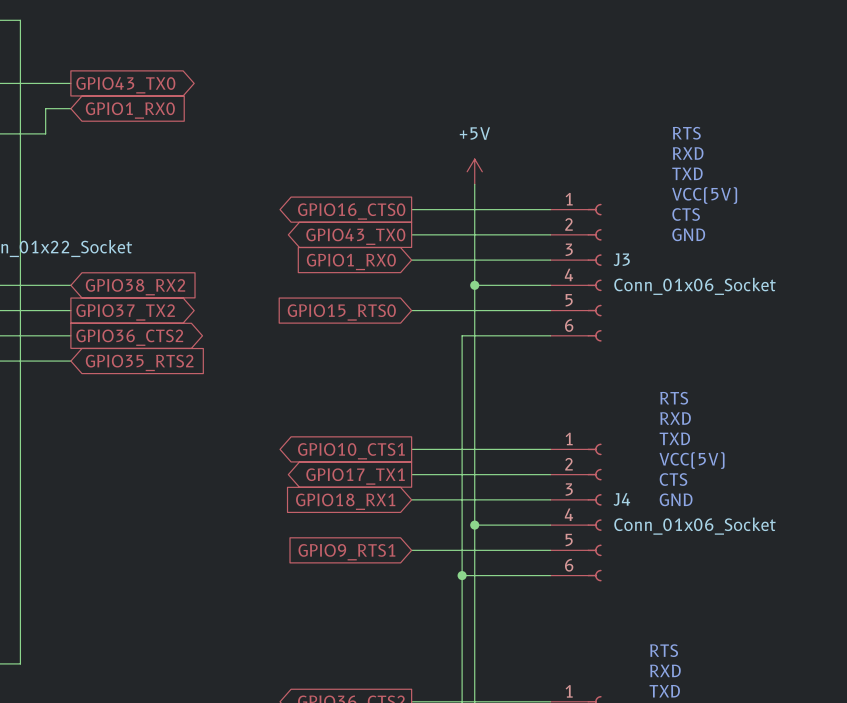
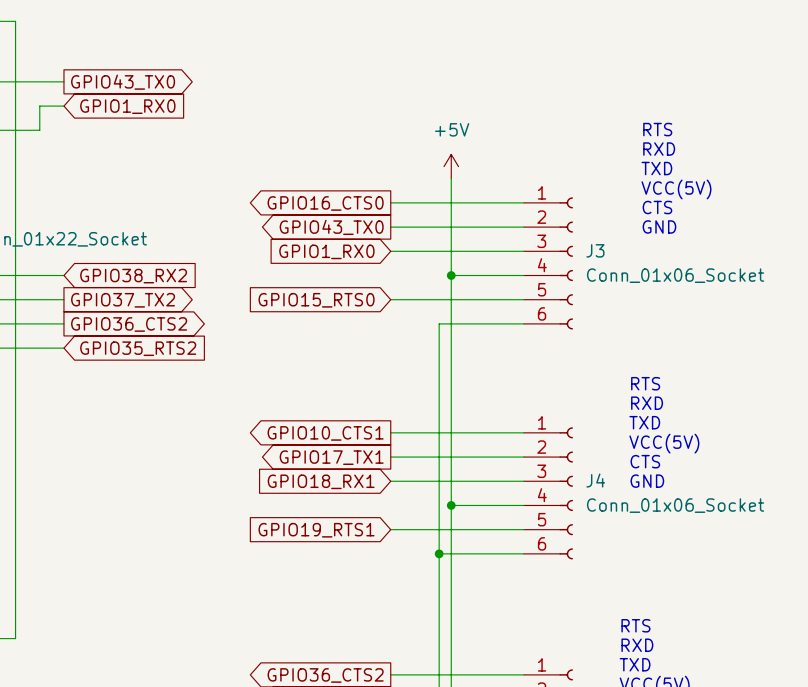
global label: GPIO9_RTS1 (346, 552) -> GPIO19_RTS1 (316, 530)

